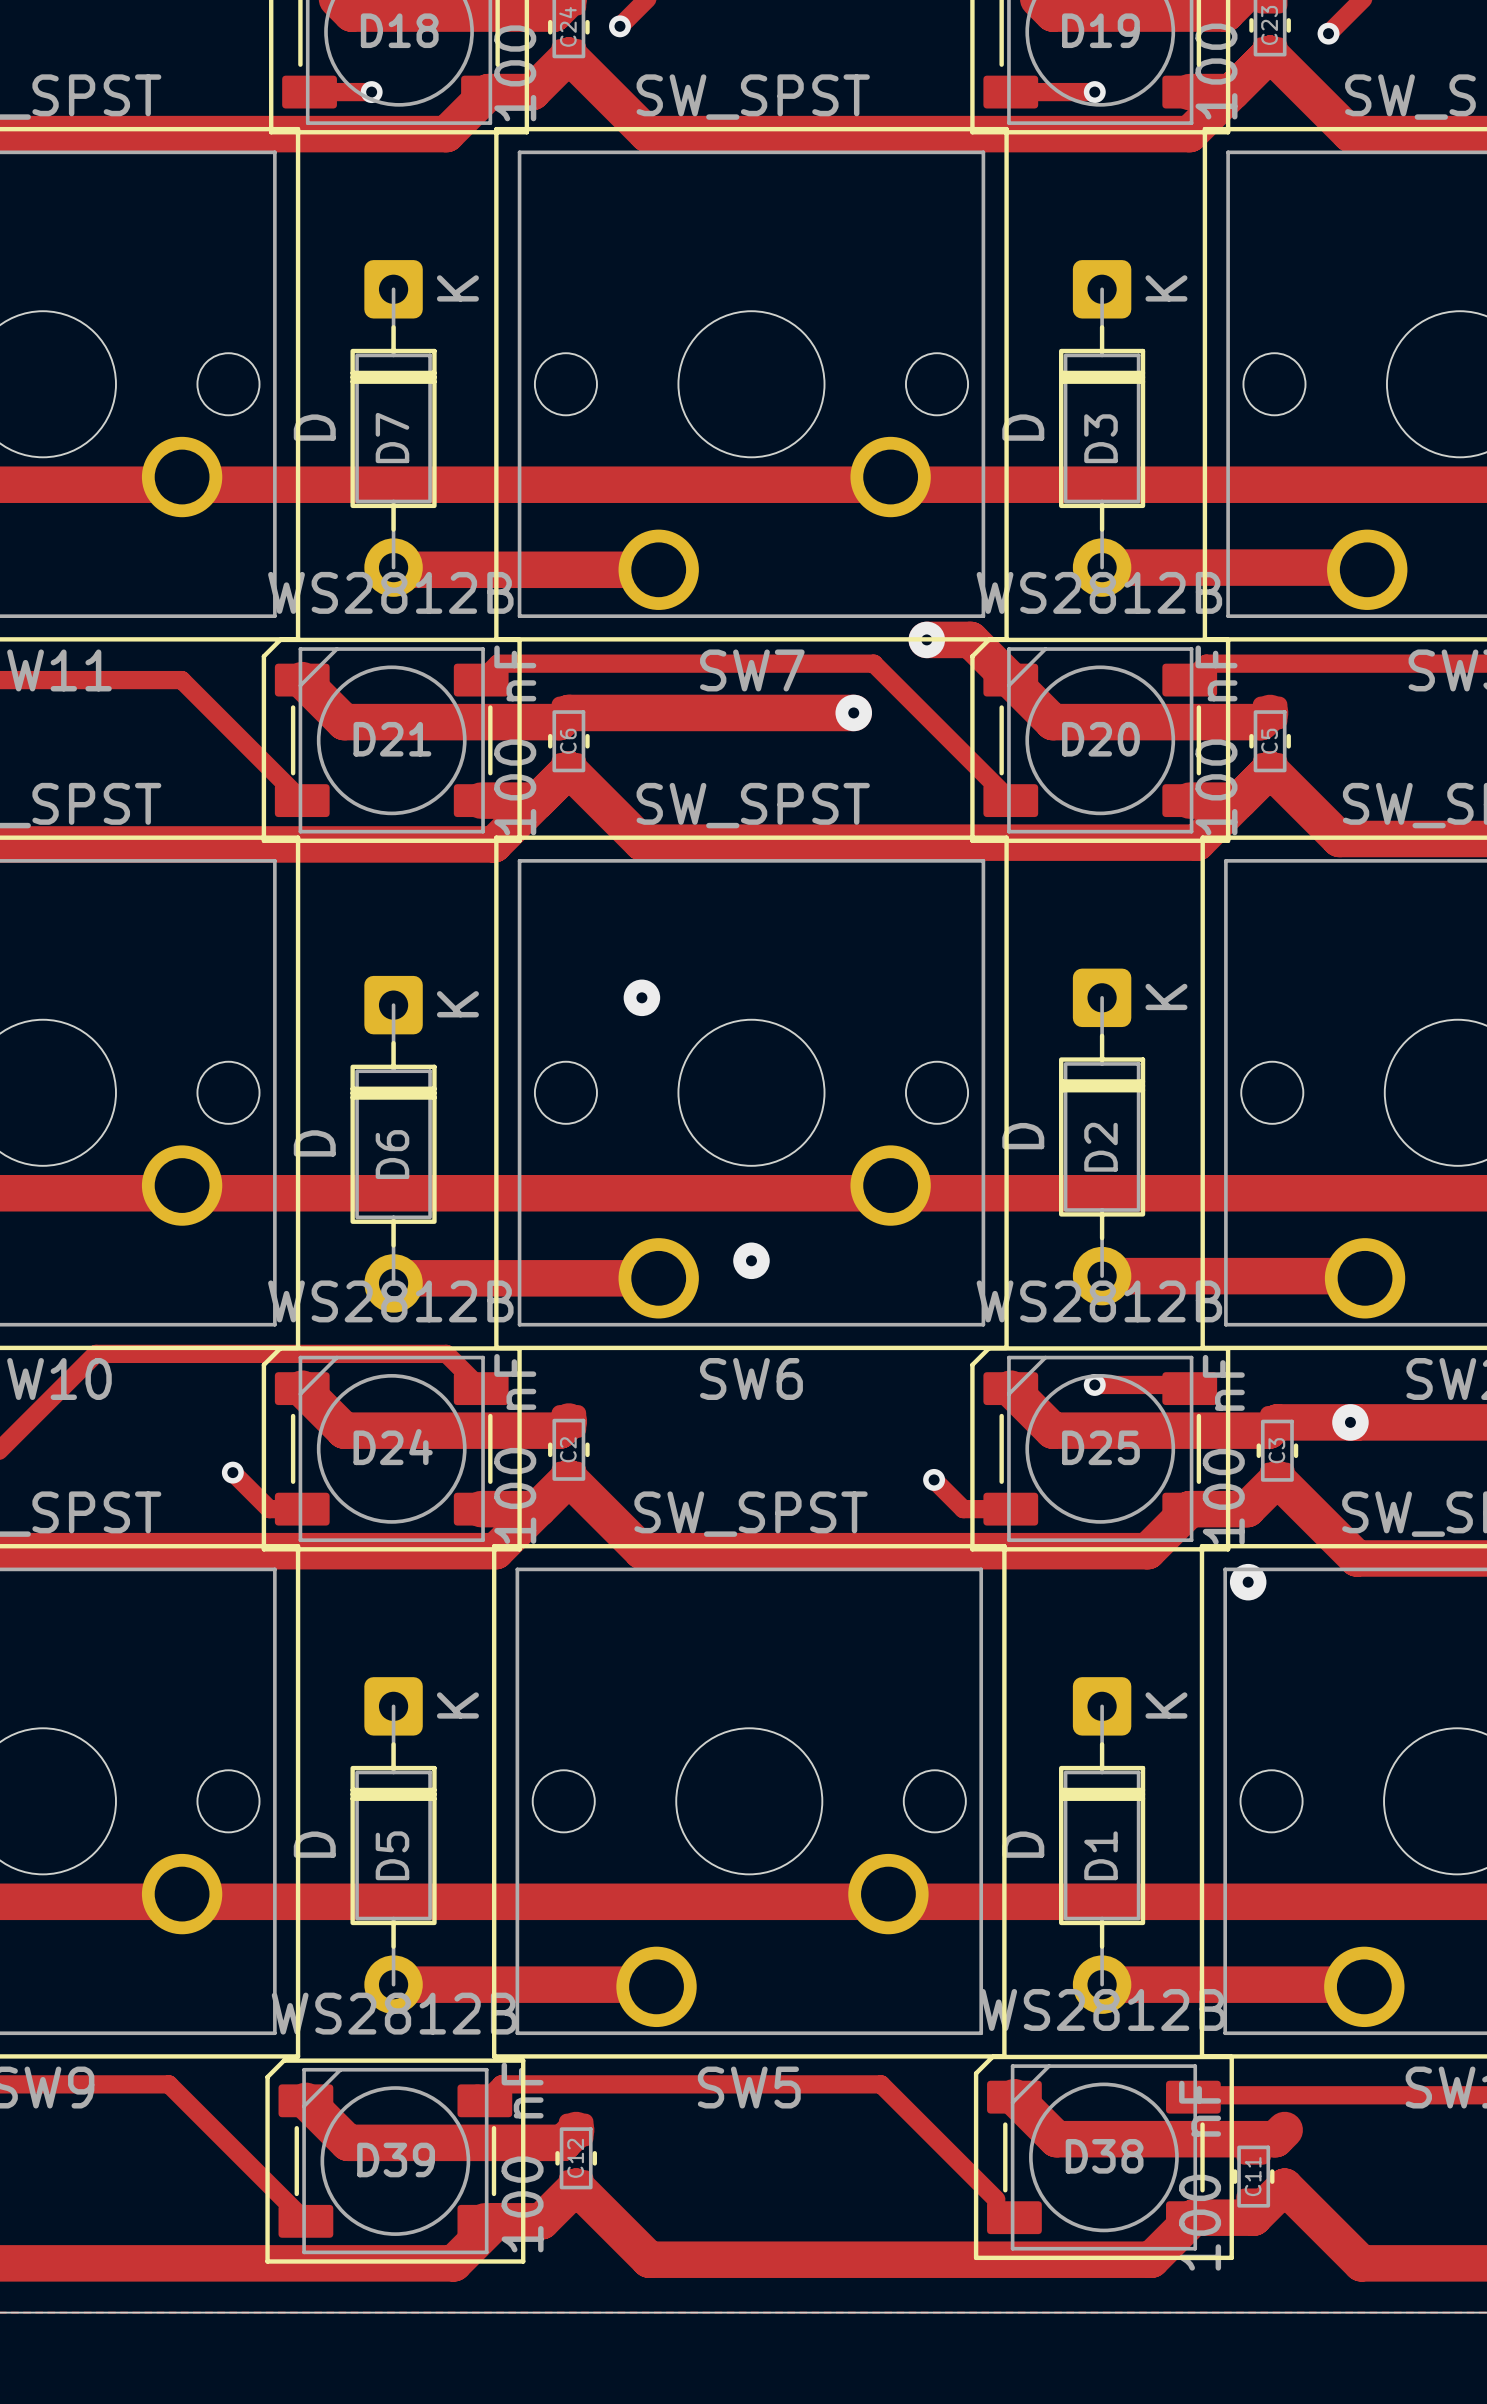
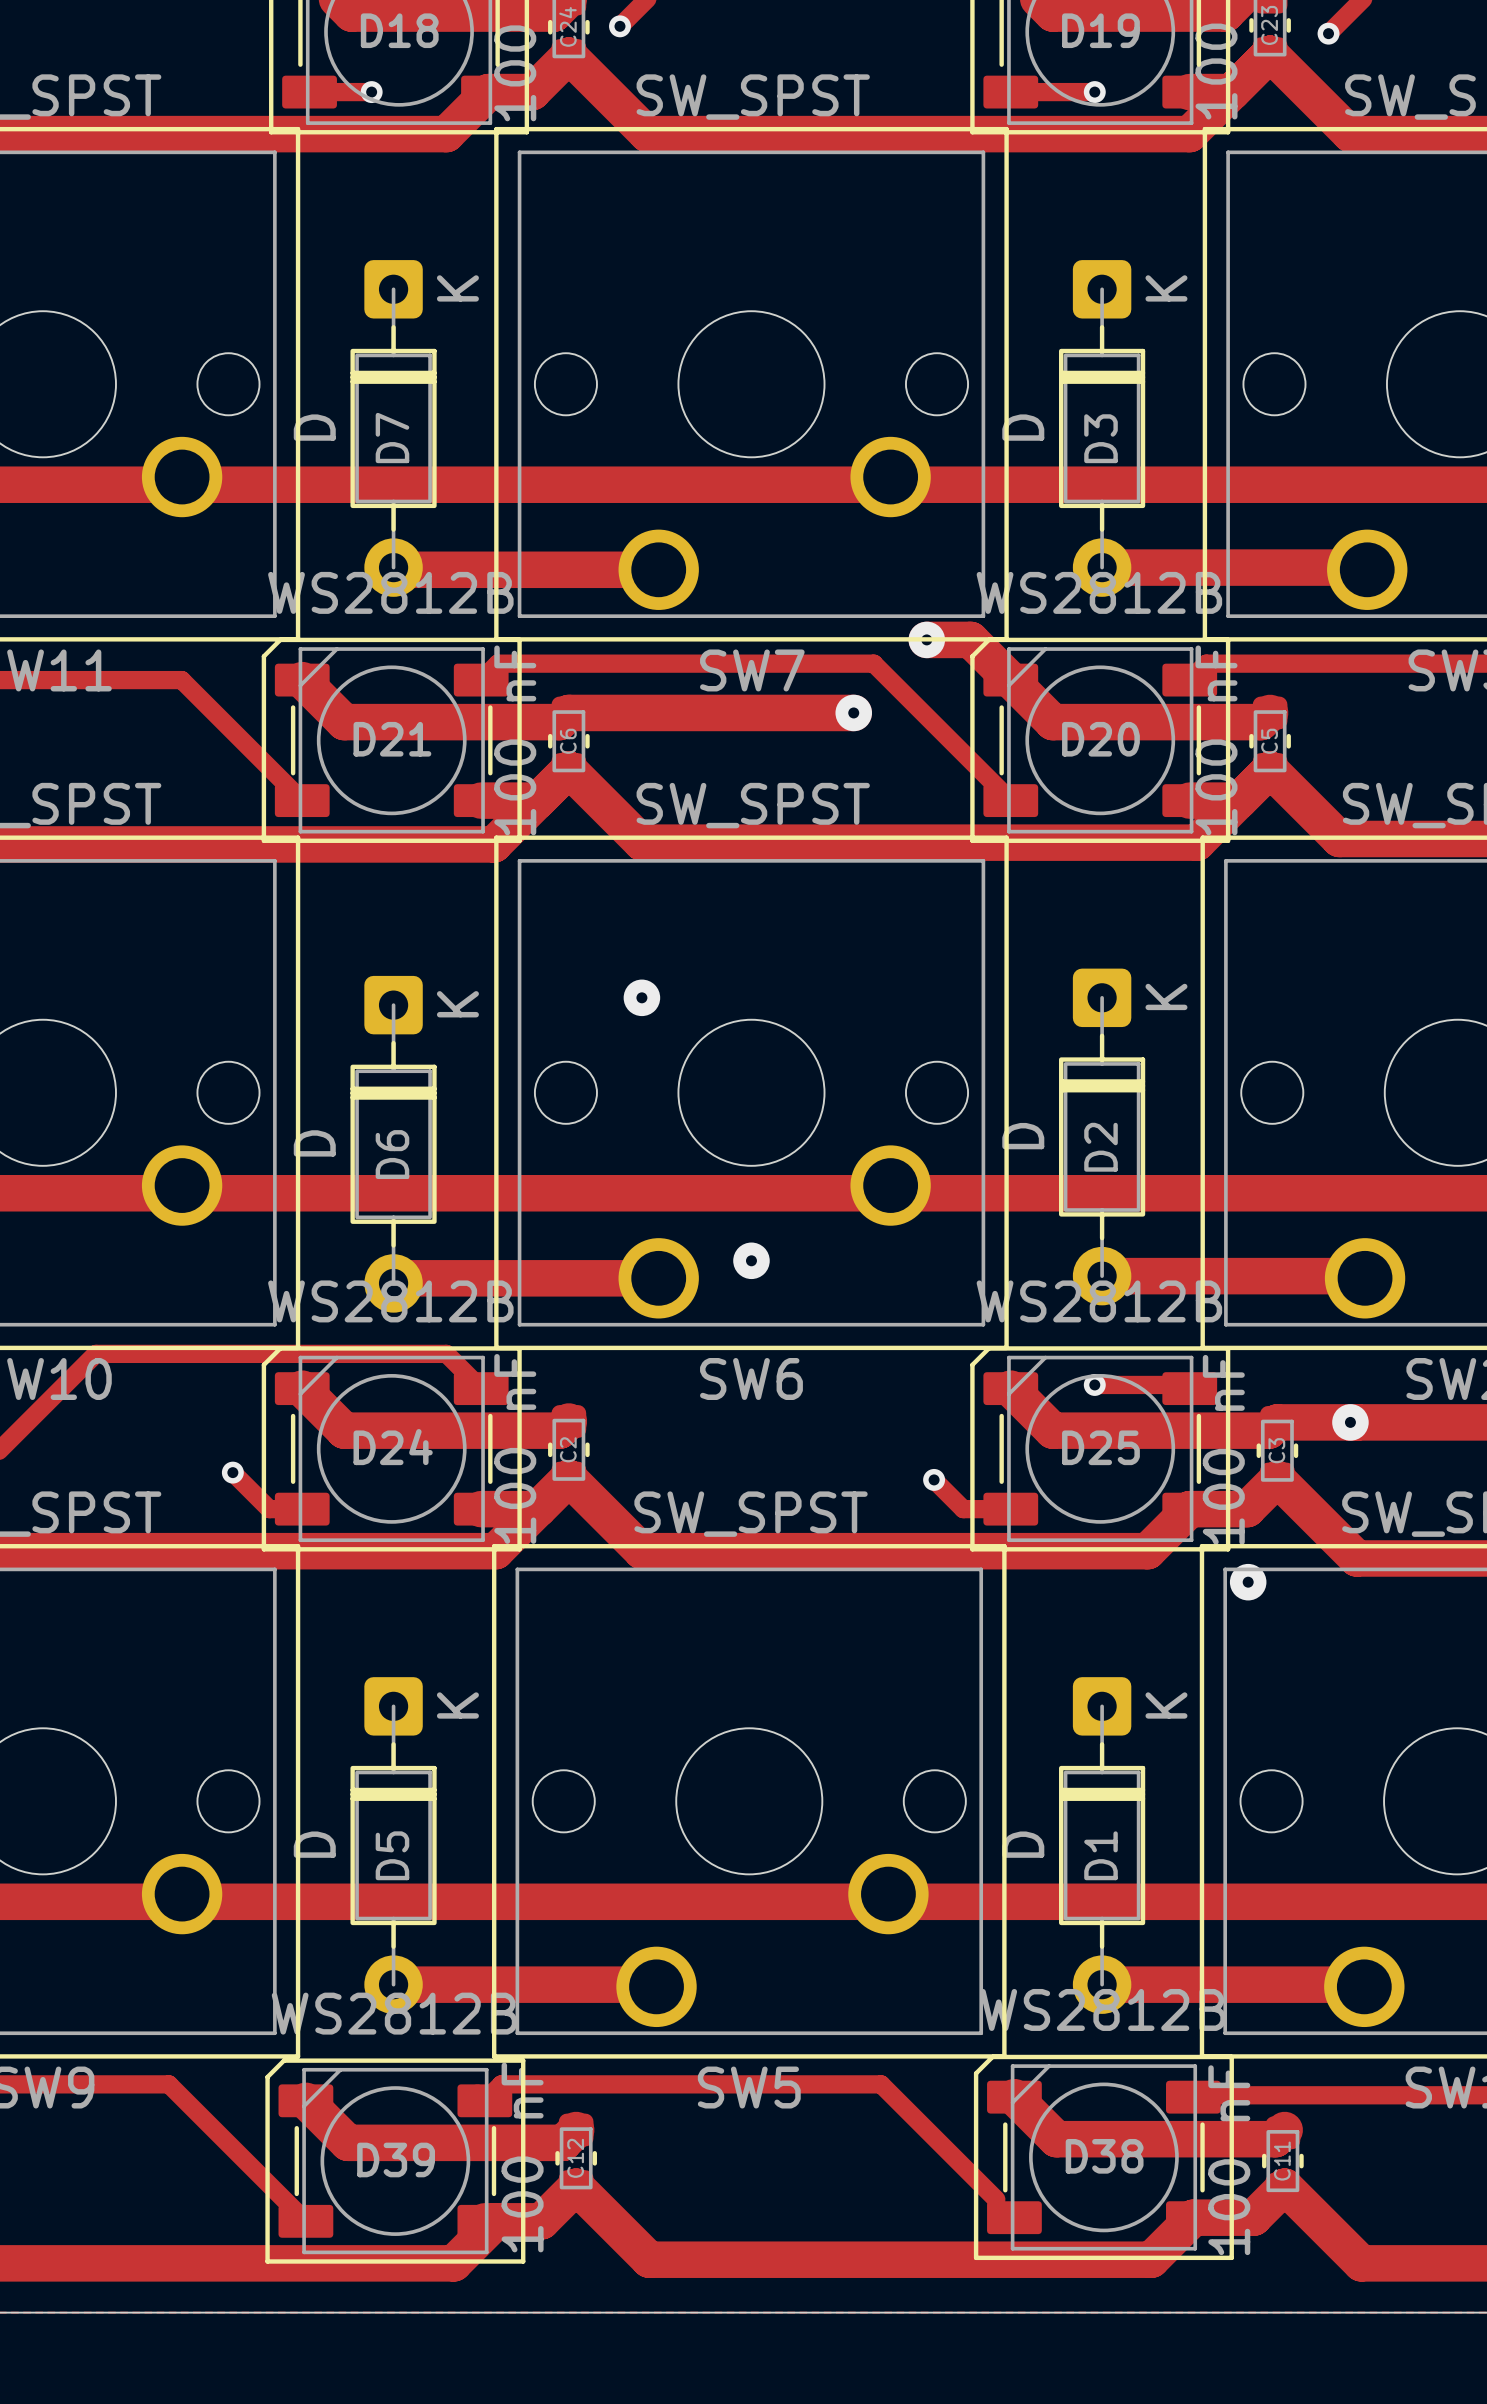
C11 position: (1253, 2176) -> (1282, 2161)

